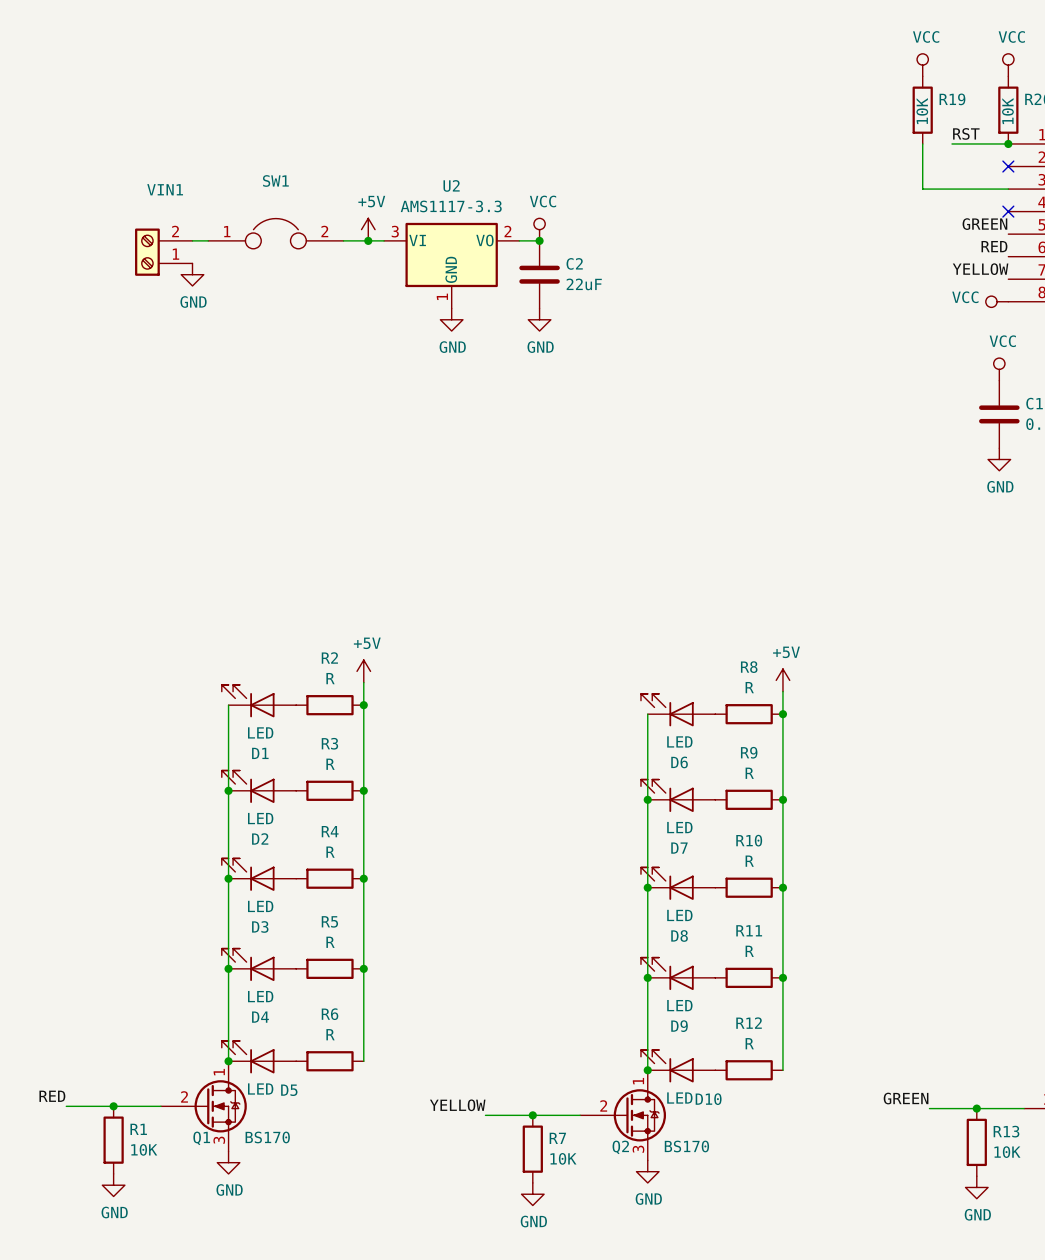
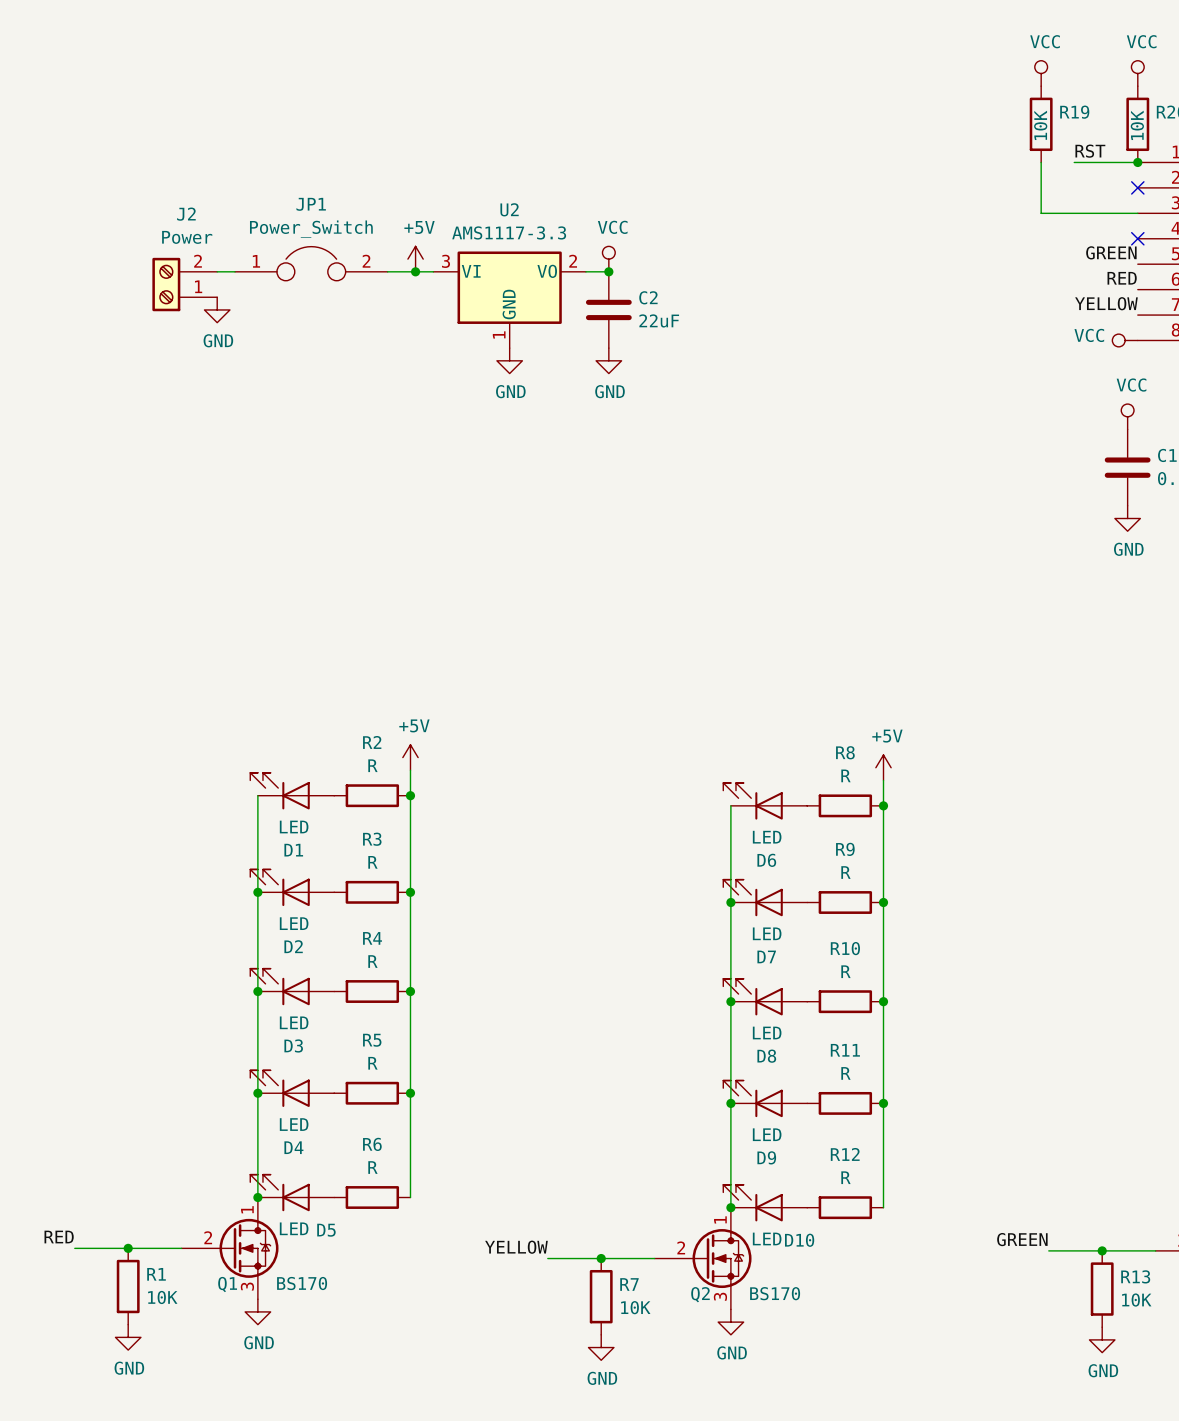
SW1 name: SW1 (275, 180) -> JP1 (311, 204)
VIN1 name: VIN1 (165, 189) -> J2 (186, 214)
SW1 value: none -> Power_Switch (311, 229)
VIN1 value: none -> Power (187, 237)

